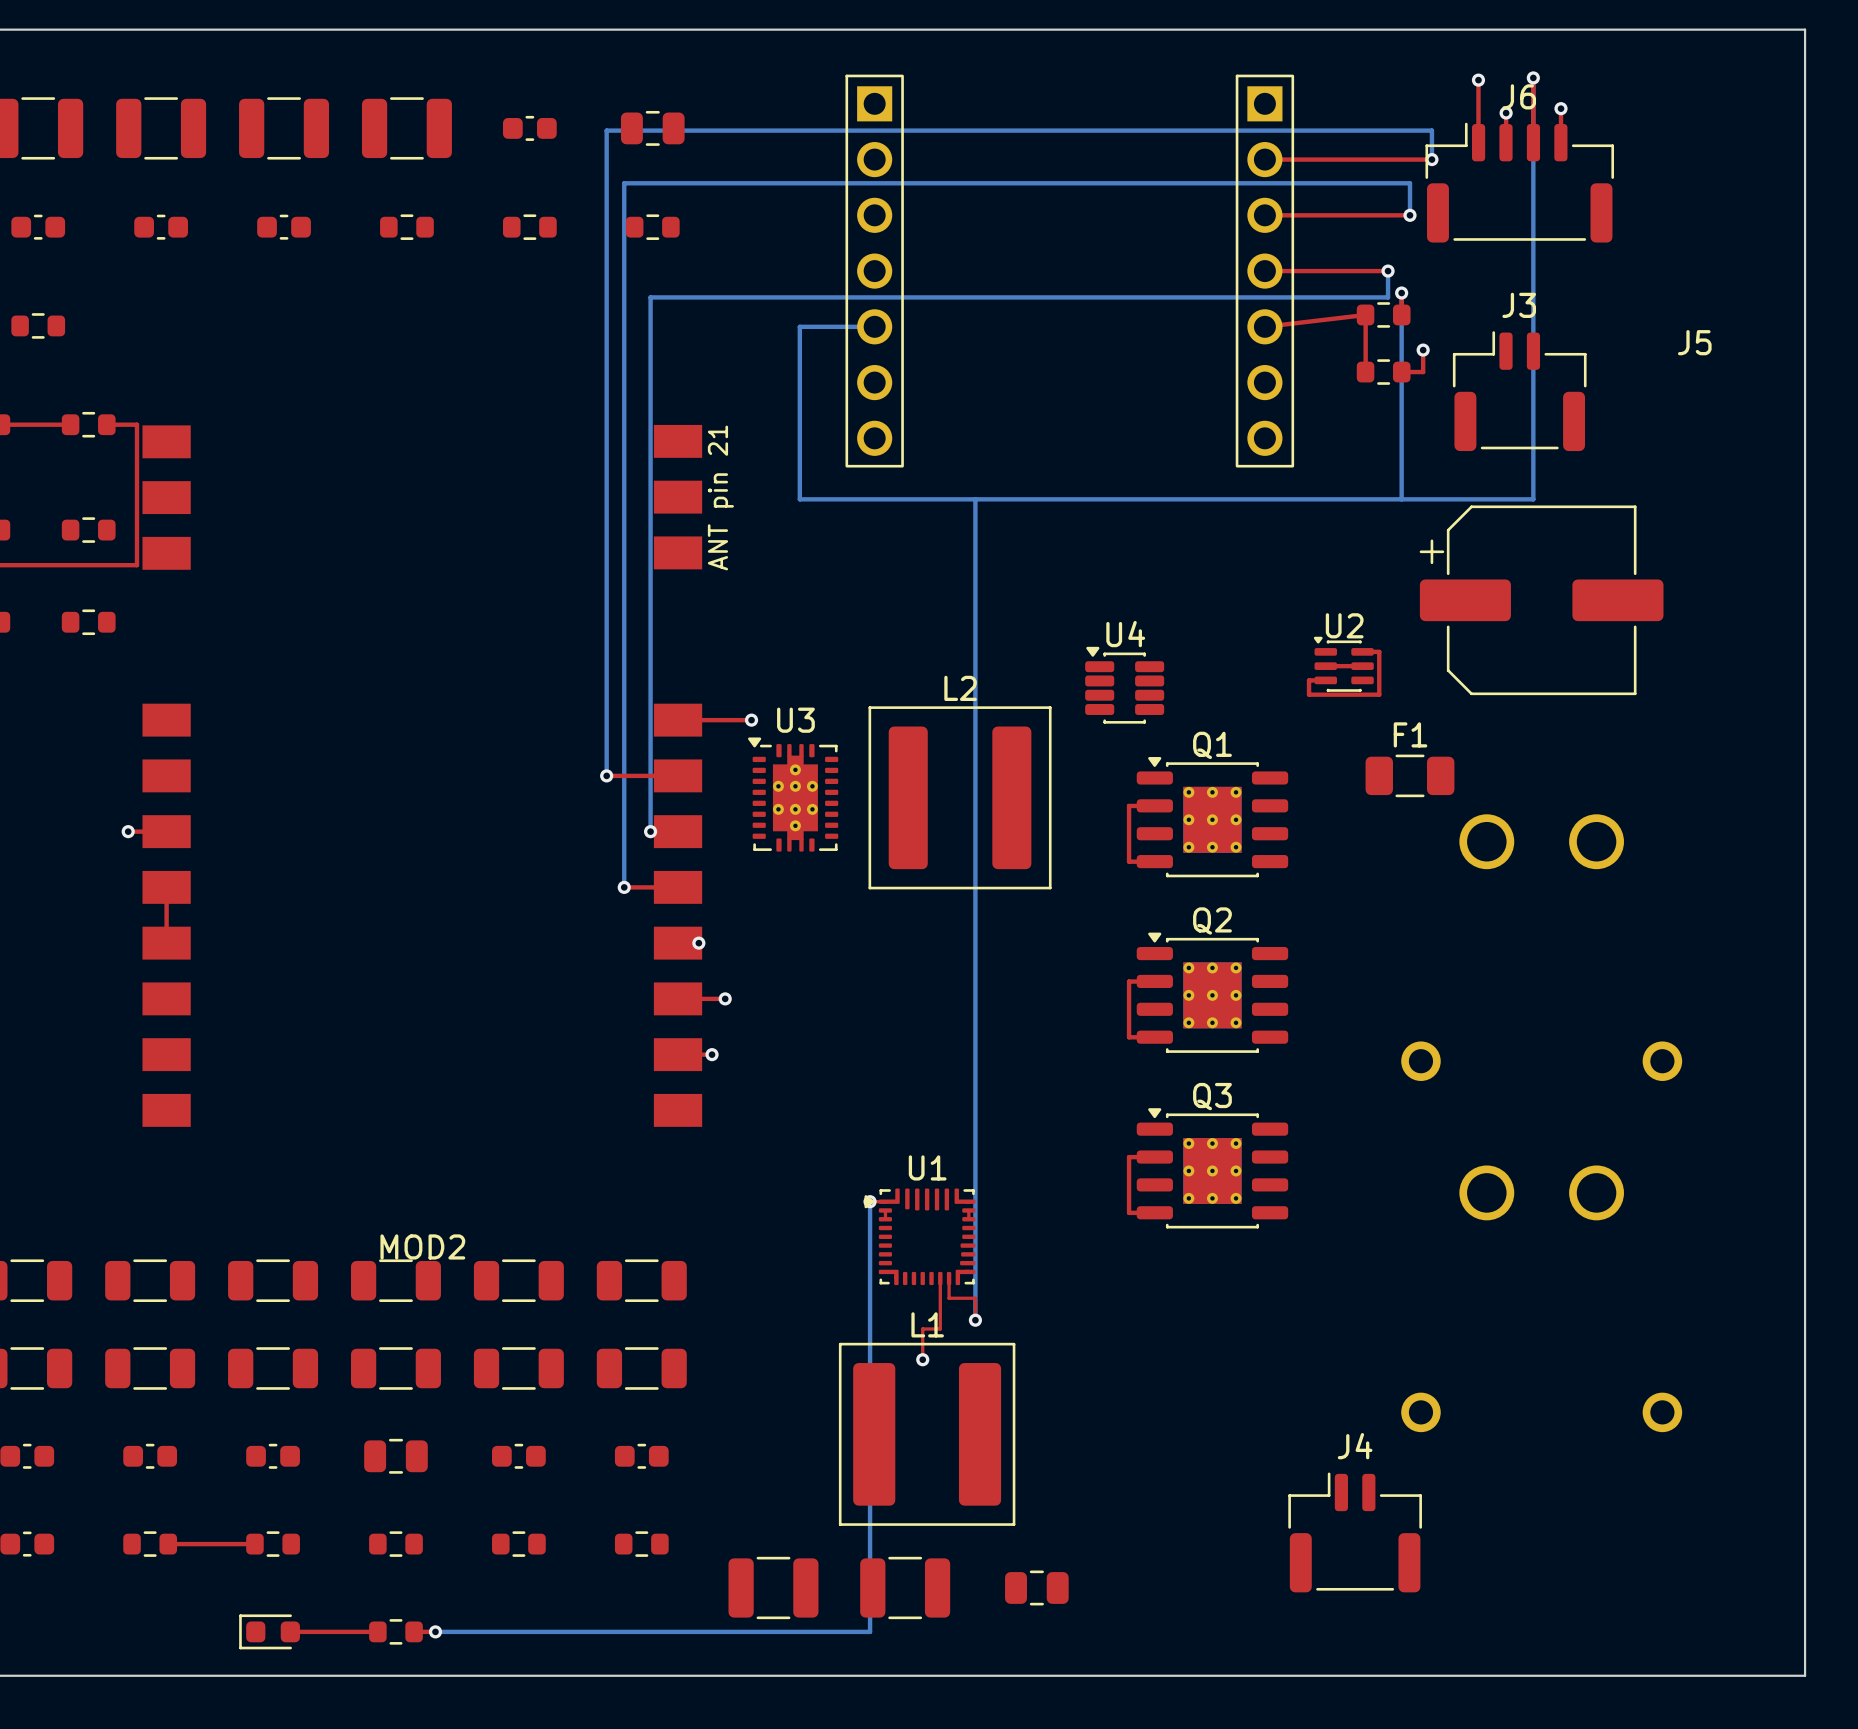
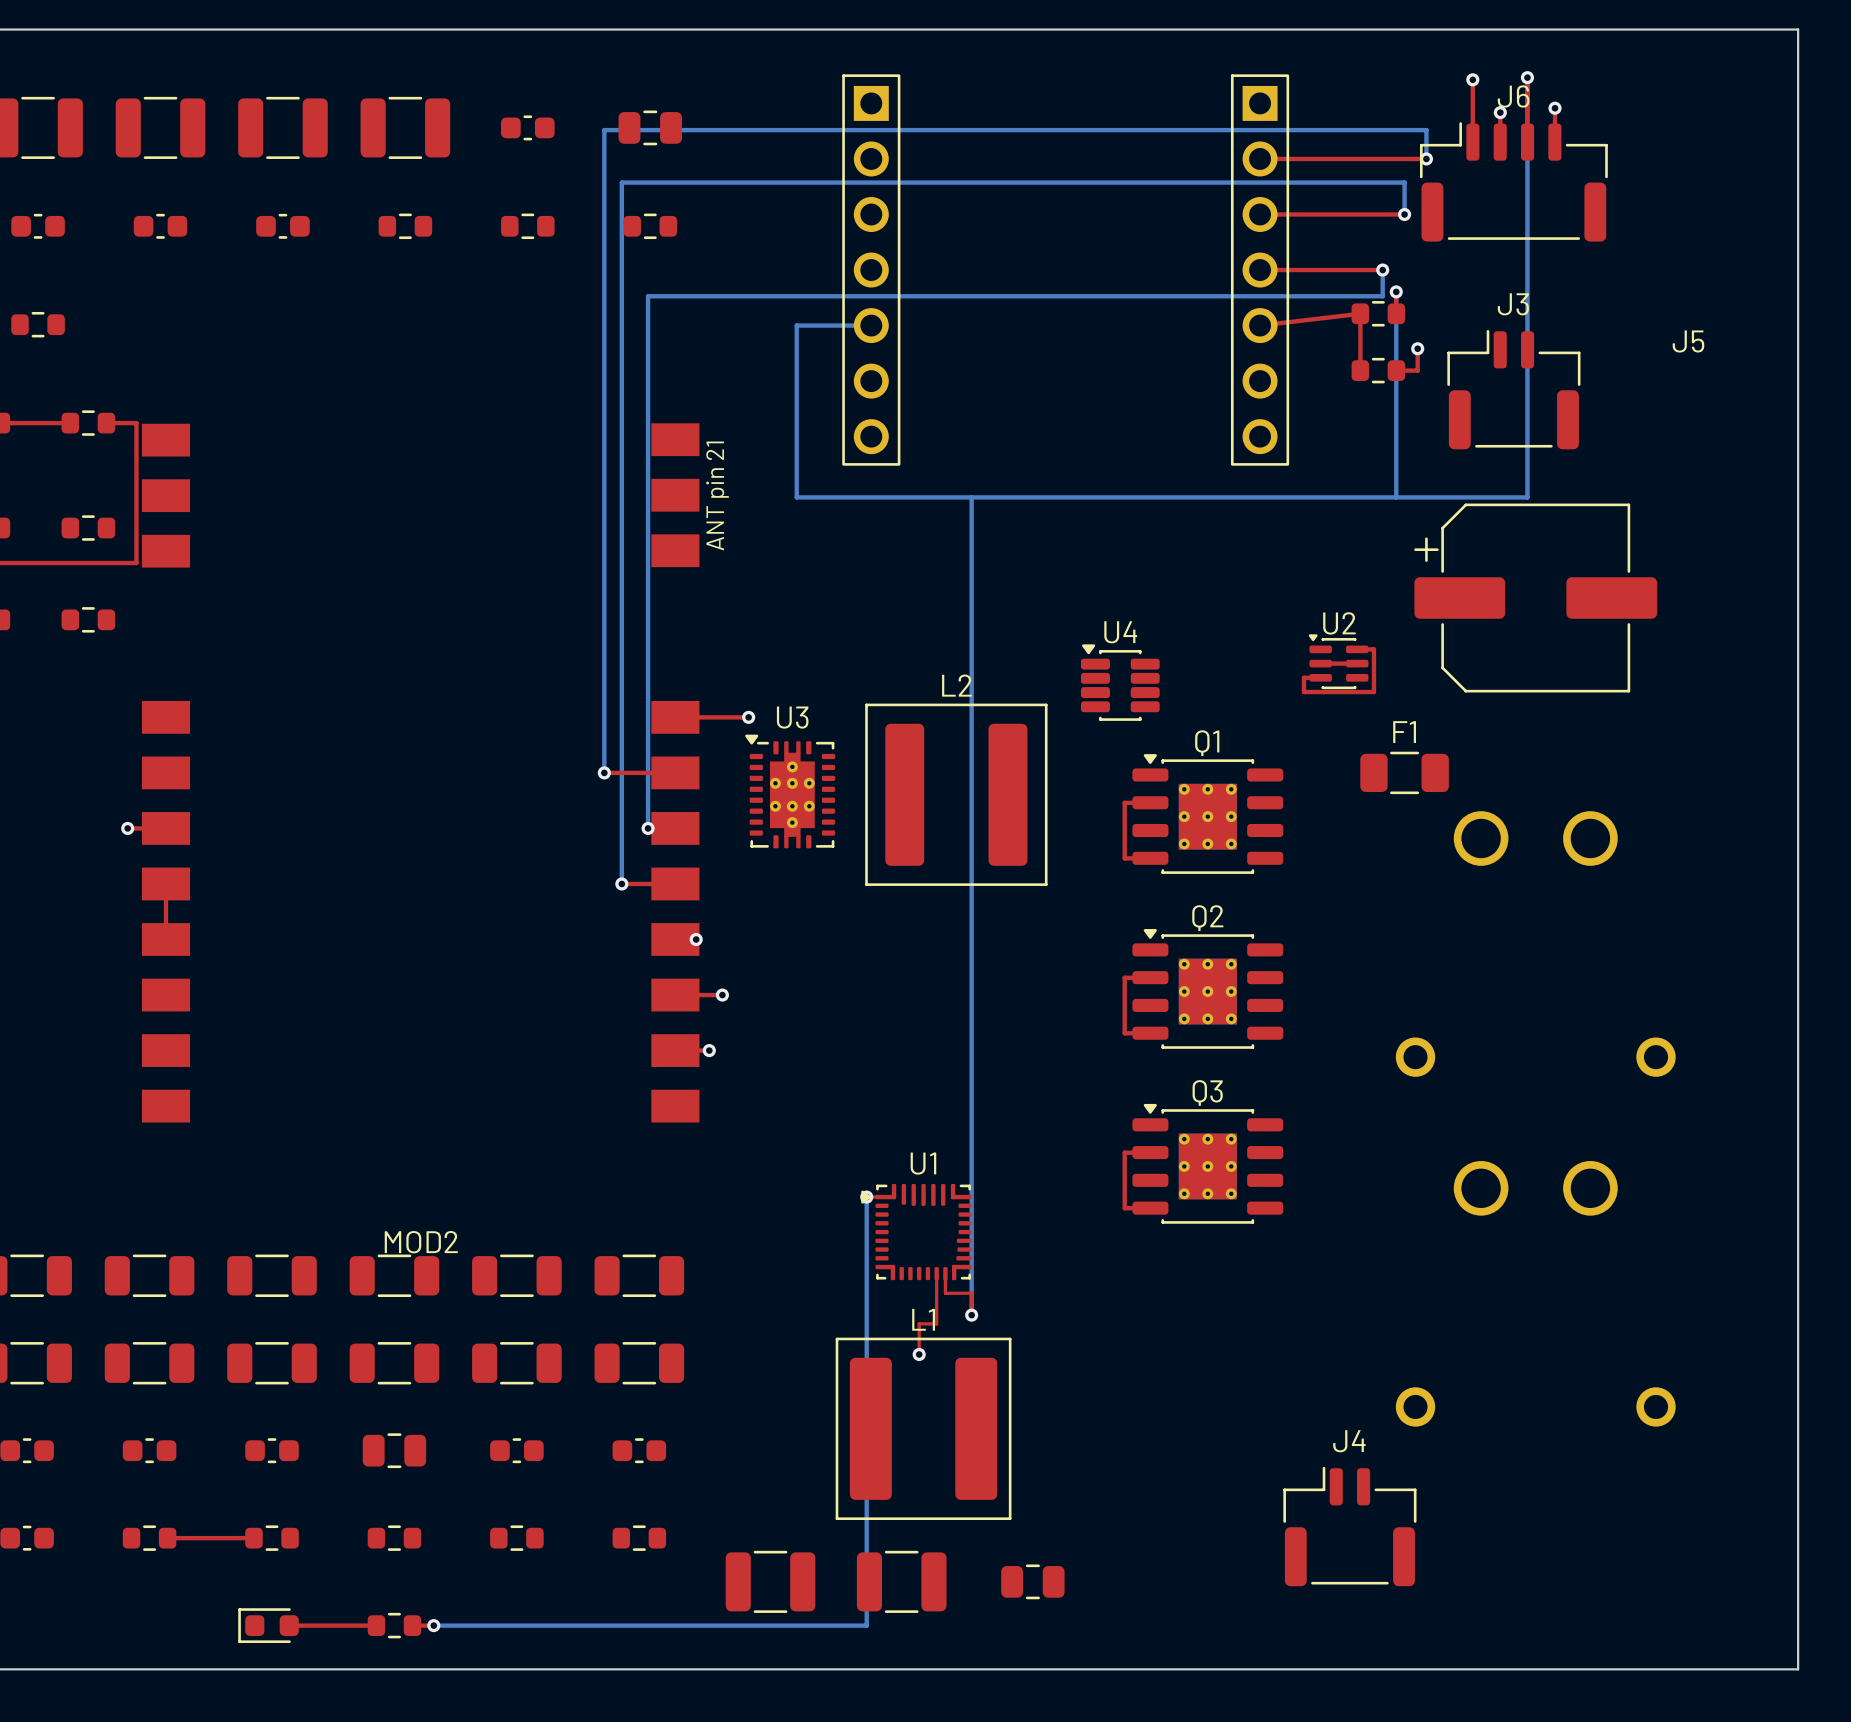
top track: (885, 1210) (885, 1219) -> none
top track: (968, 1210) (968, 1219) -> none

